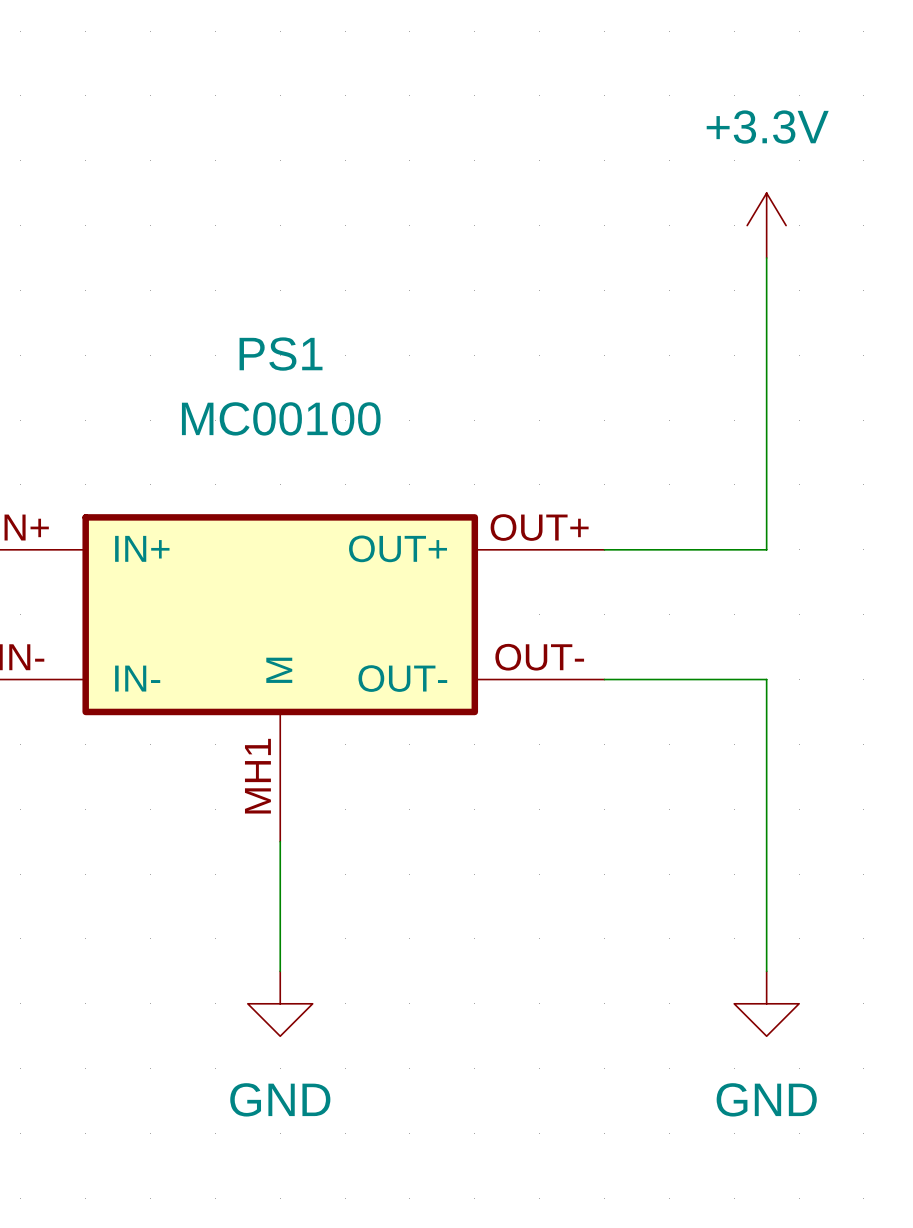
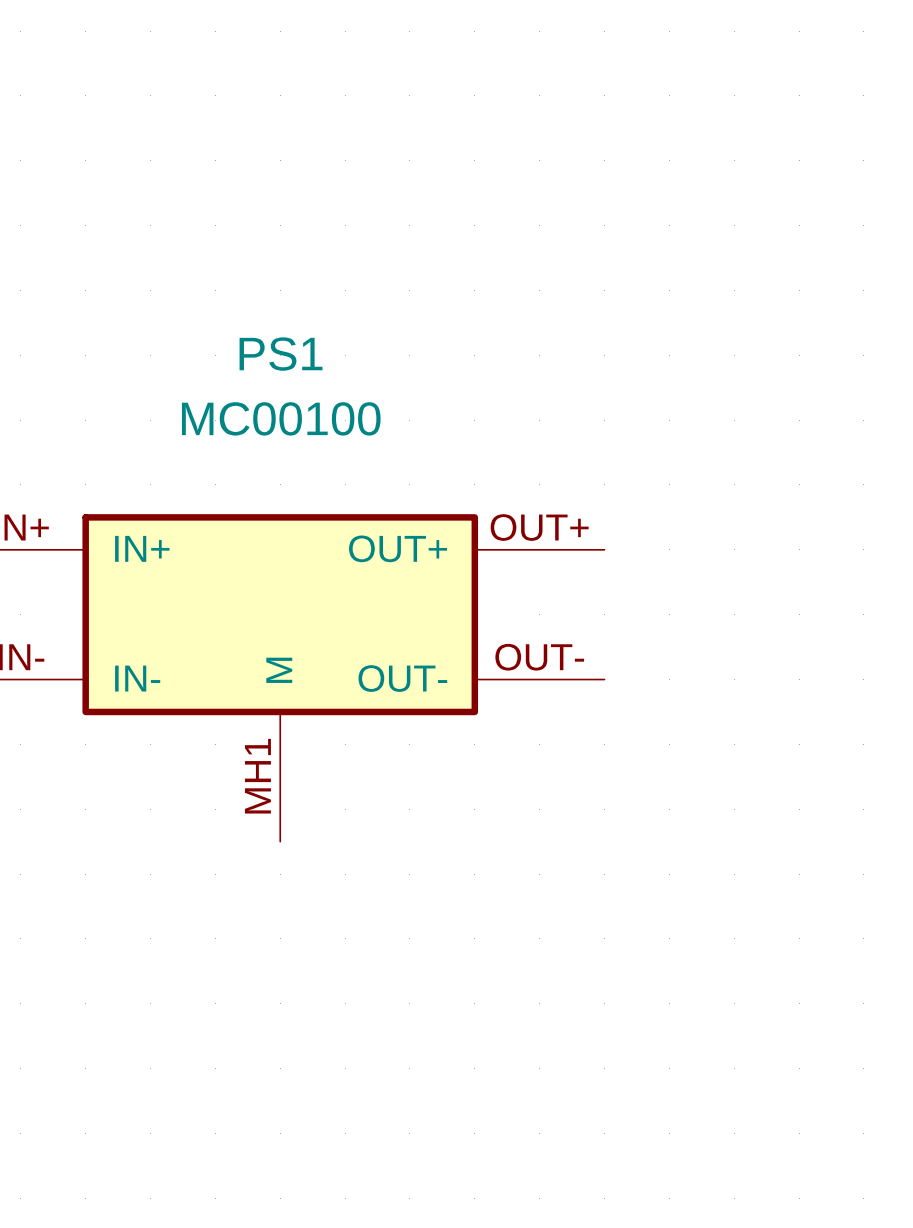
power symbol: +3.3V (766, 225) -> none
wire: (766, 257) (766, 549) (604, 549) -> none
wire: (604, 679) (766, 679) (766, 971) -> none
wire: (280, 841) (280, 971) -> none
power symbol: GND (280, 1003) -> none
power symbol: GND (766, 1003) -> none

